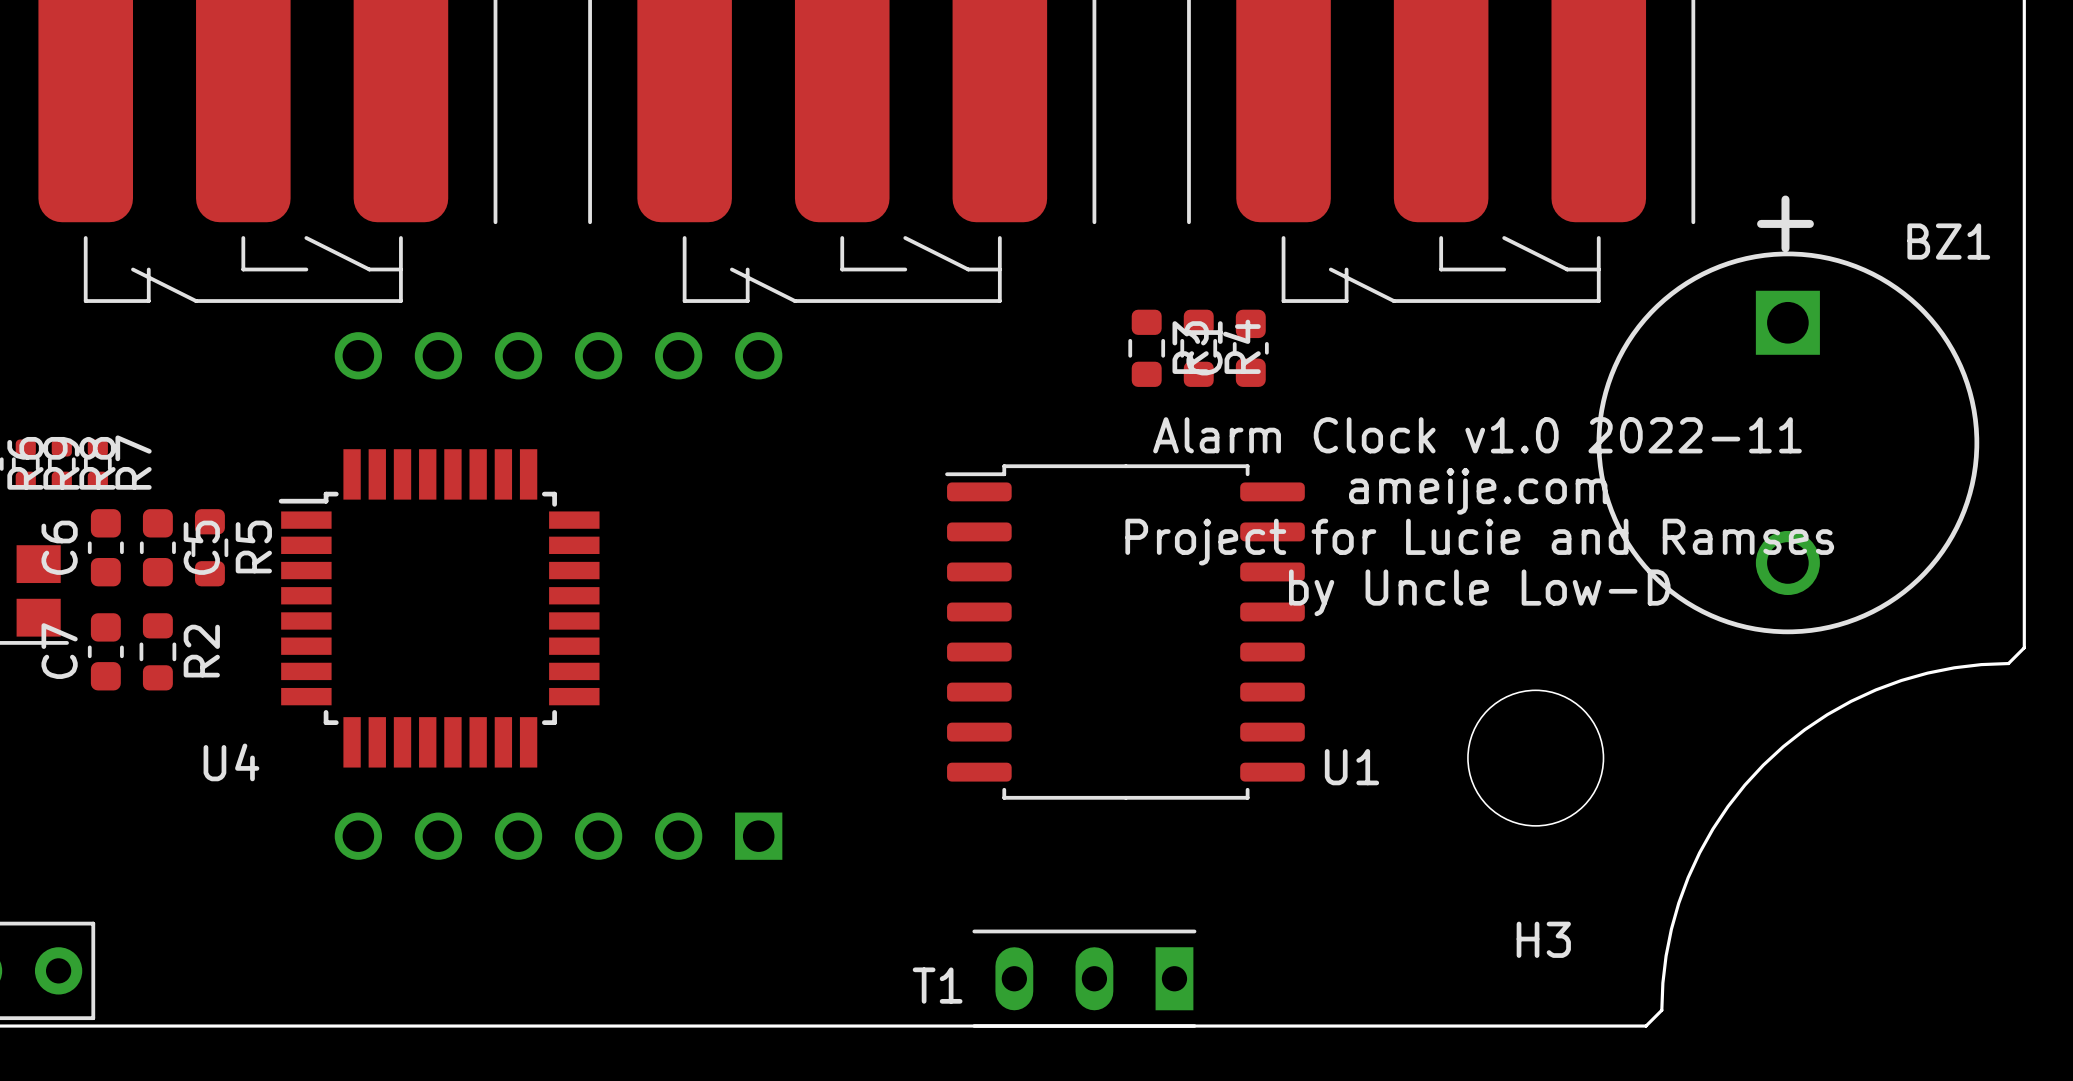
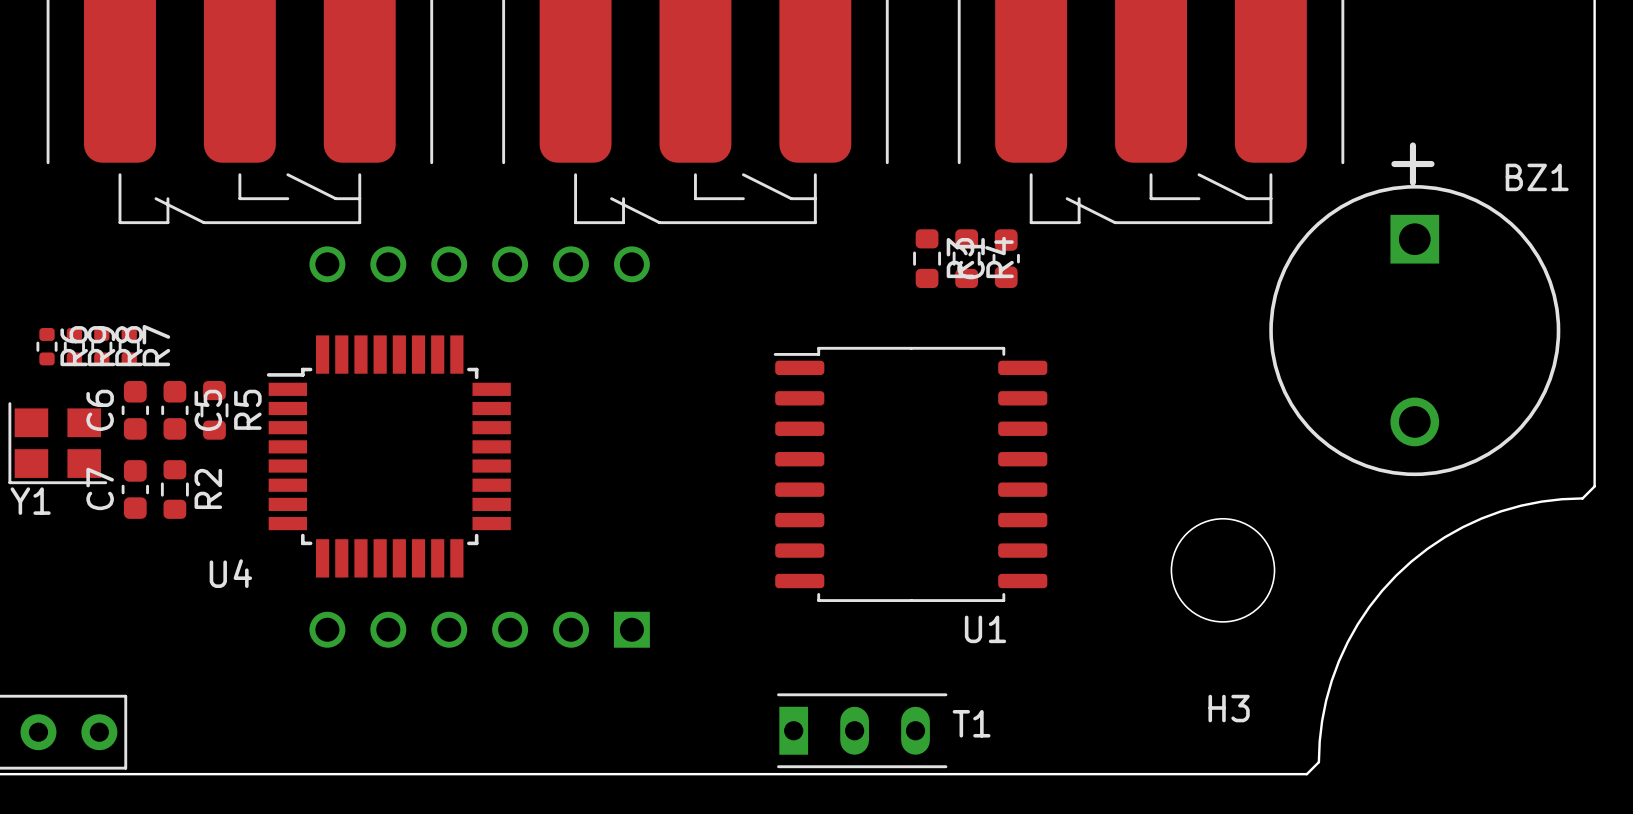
text: Alarm Clock v1.0 2022-11 (1477, 435) -> none
text: ameije.com (1478, 491) -> none
text: Project for Lucie and Ramses (1479, 542) -> none
text: by Uncle Low-D (1479, 592) -> none
U1 name position: U1 (1351, 767) -> U1 (985, 629)
T1 rotation: 0° (1084, 978) -> 180° (862, 730)

